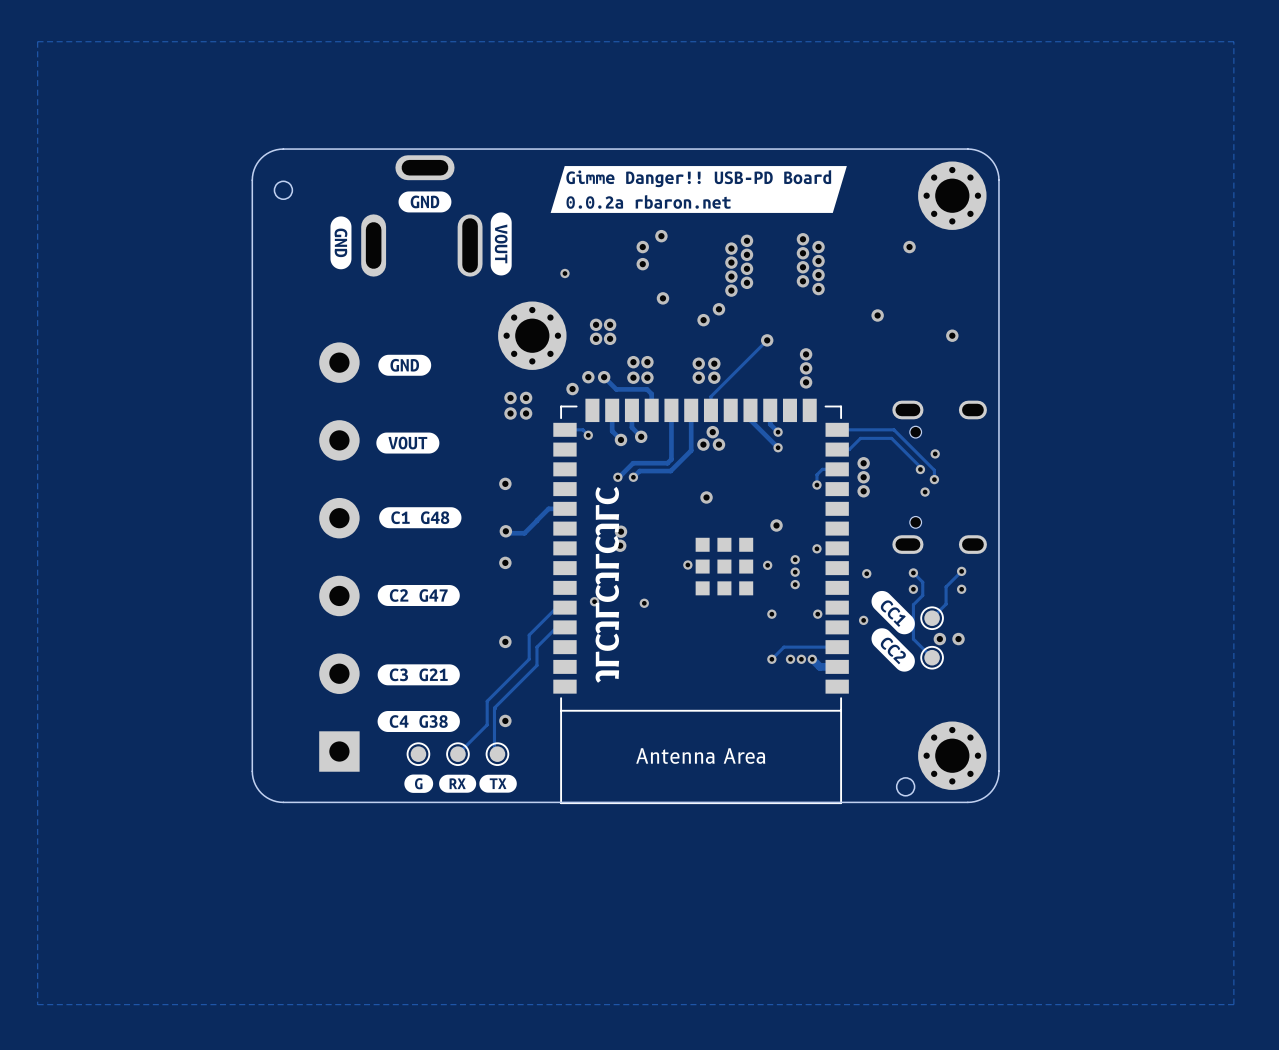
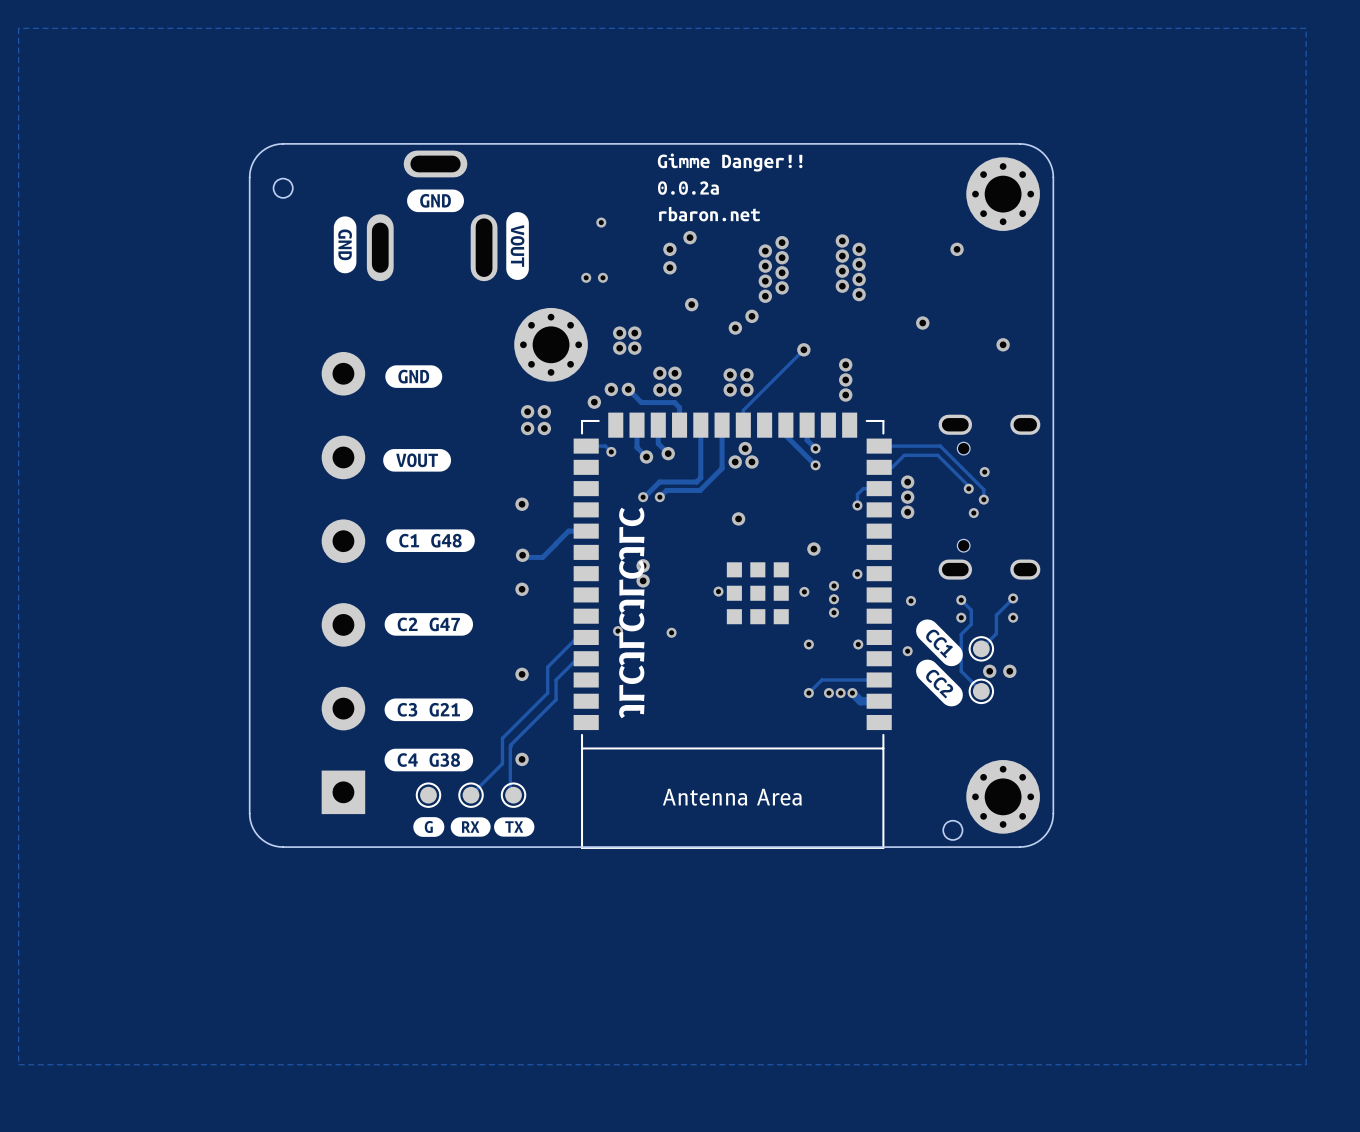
drawing shape: [550, 166, 847, 213] -> [657, 153, 803, 222]
via: none -> (601, 222)
via: none -> (602, 277)
via: (620, 531) -> none
via: none -> (643, 565)
via: (620, 545) -> none
via: none -> (643, 580)

